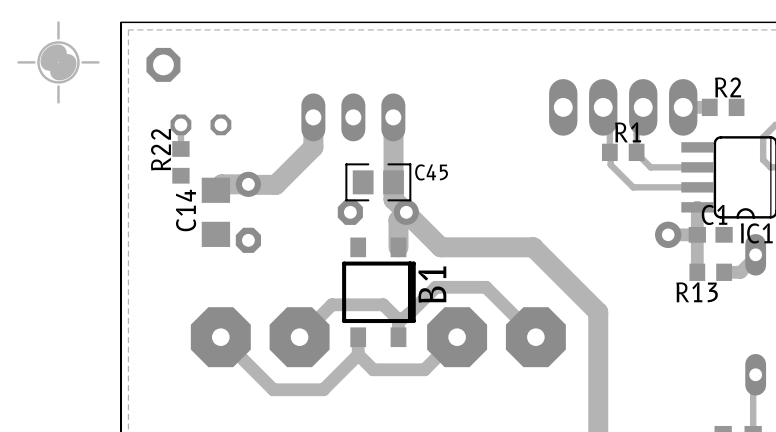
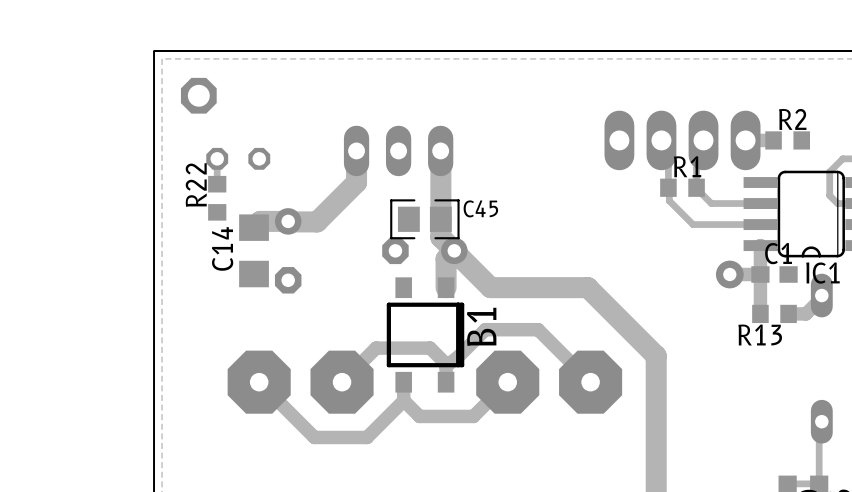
drawing: [17, 21, 100, 104] -> none

